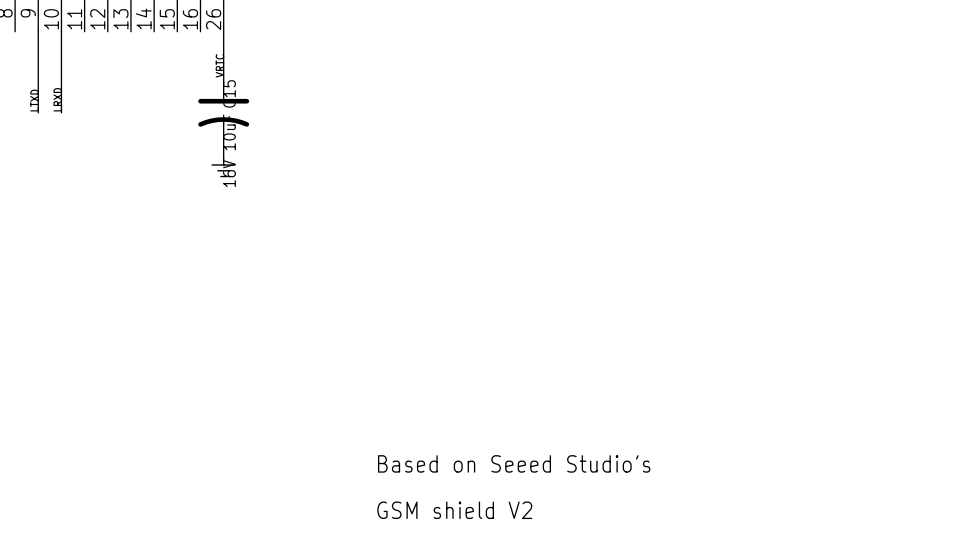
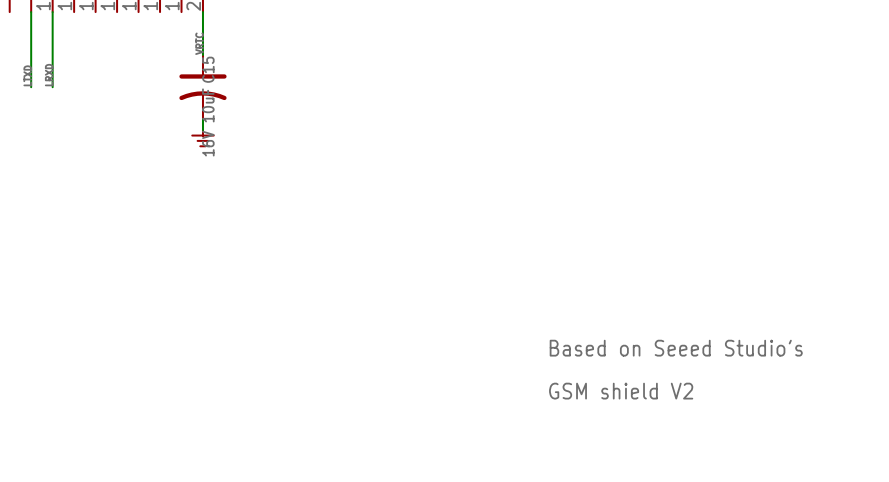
text: none -> Based on Seeed Studio's (676, 348)
text: none -> GSM shield V2 (621, 391)
text: Based on Seeed Studio's (514, 463) -> none
text: GSM shield V2 (454, 510) -> none

